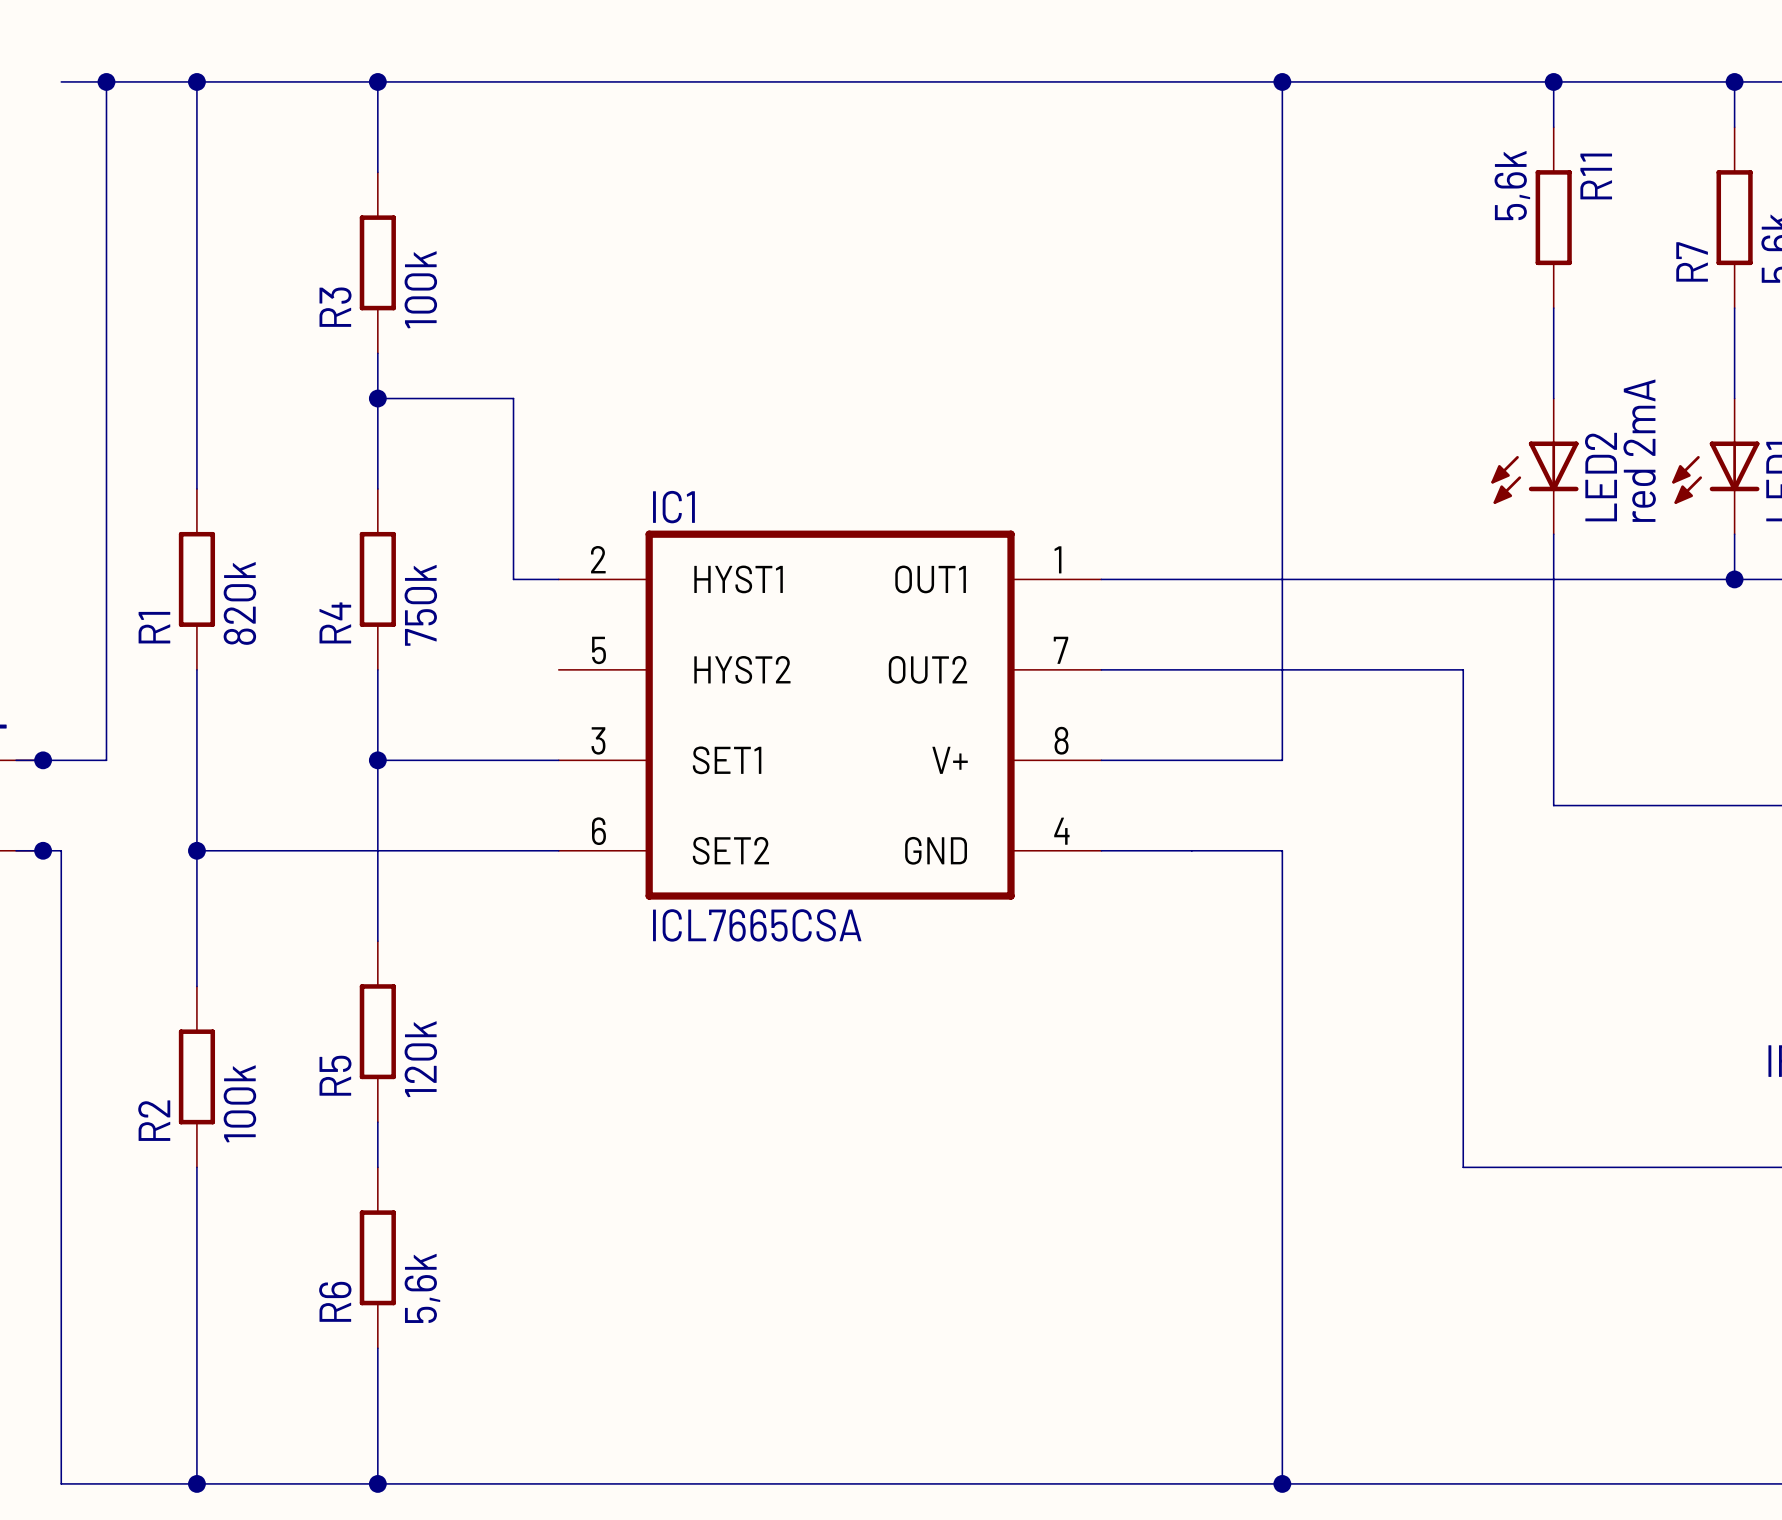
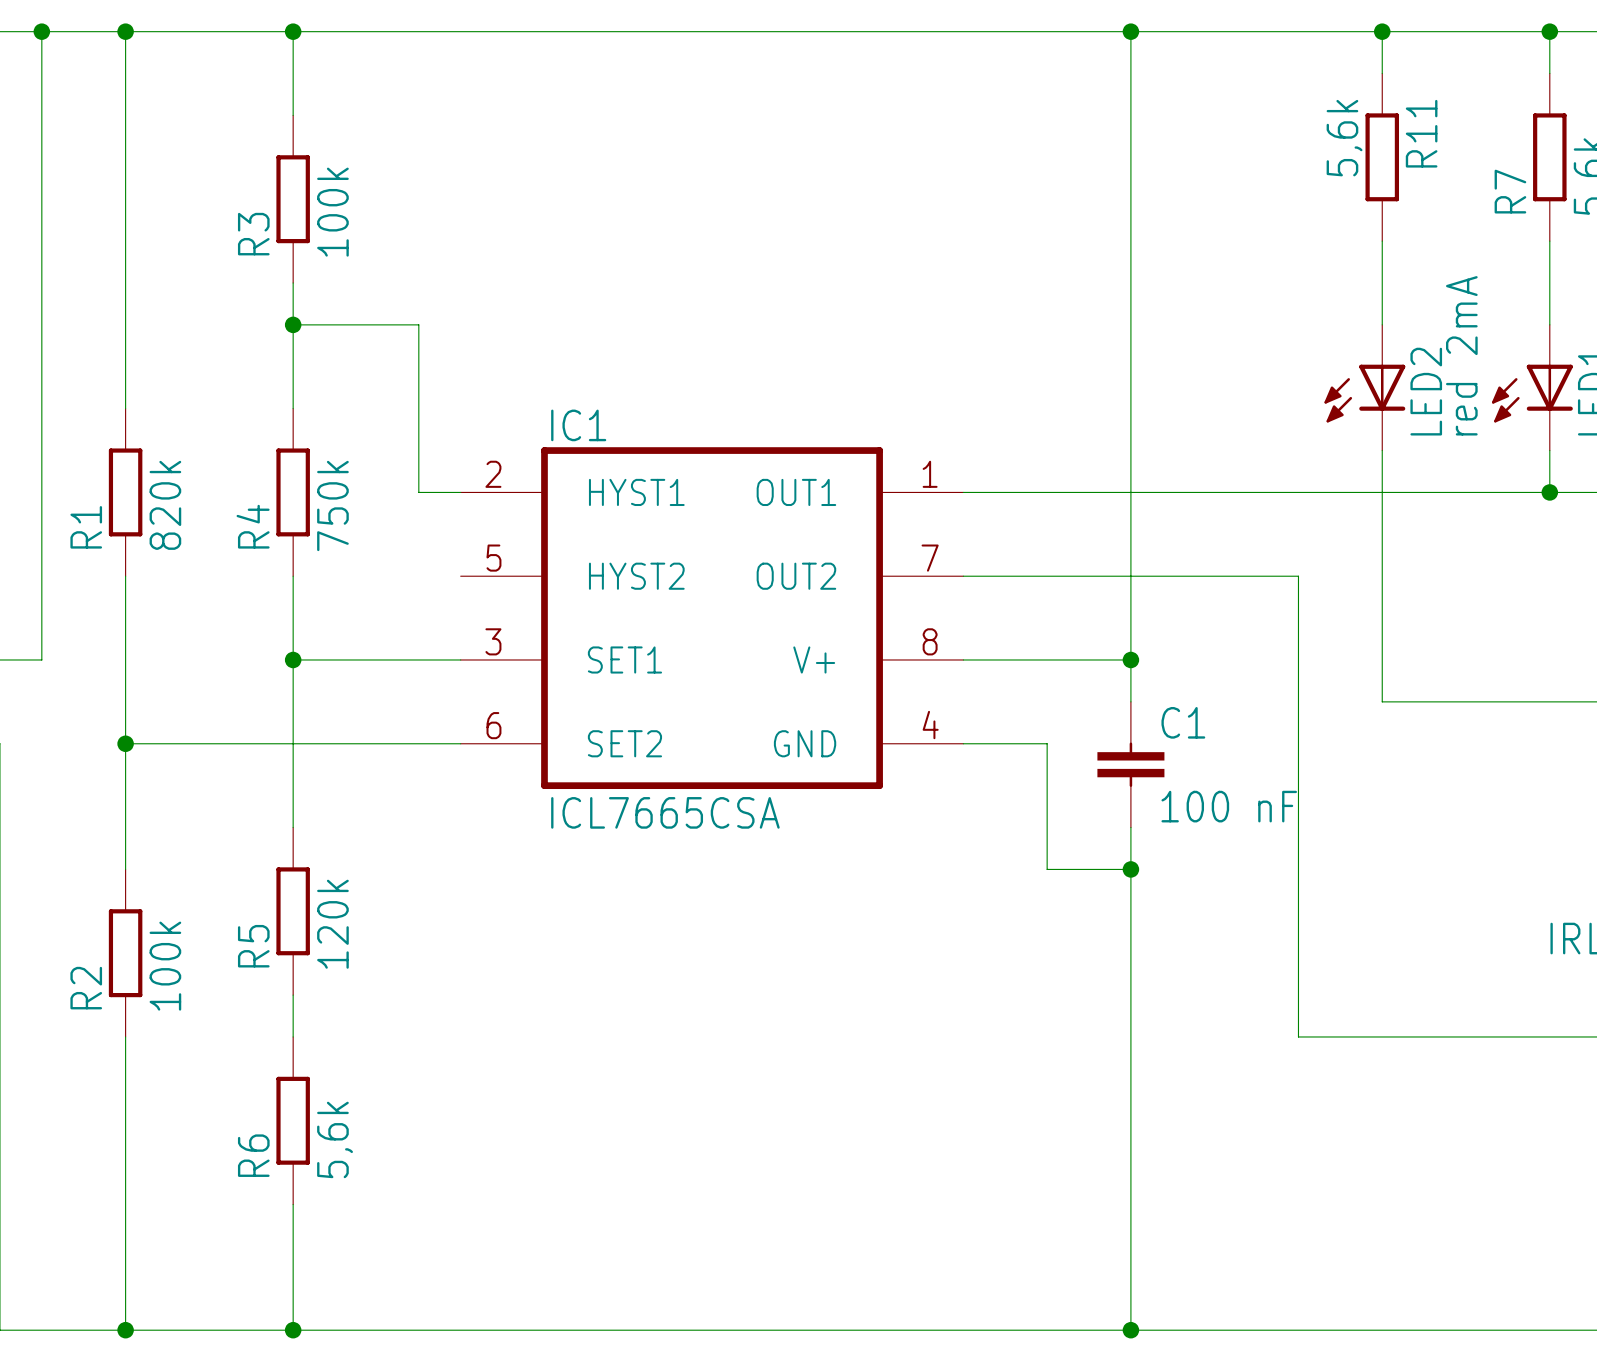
wire: none -> (1130, 659) (1130, 701)
junction: none -> (1130, 659)
wire: (1191, 850) (1282, 850) (1282, 941) -> (1047, 743) (1047, 869) (1130, 869)
C1: none -> 100 nF (1130, 764)
junction: none -> (1130, 869)

